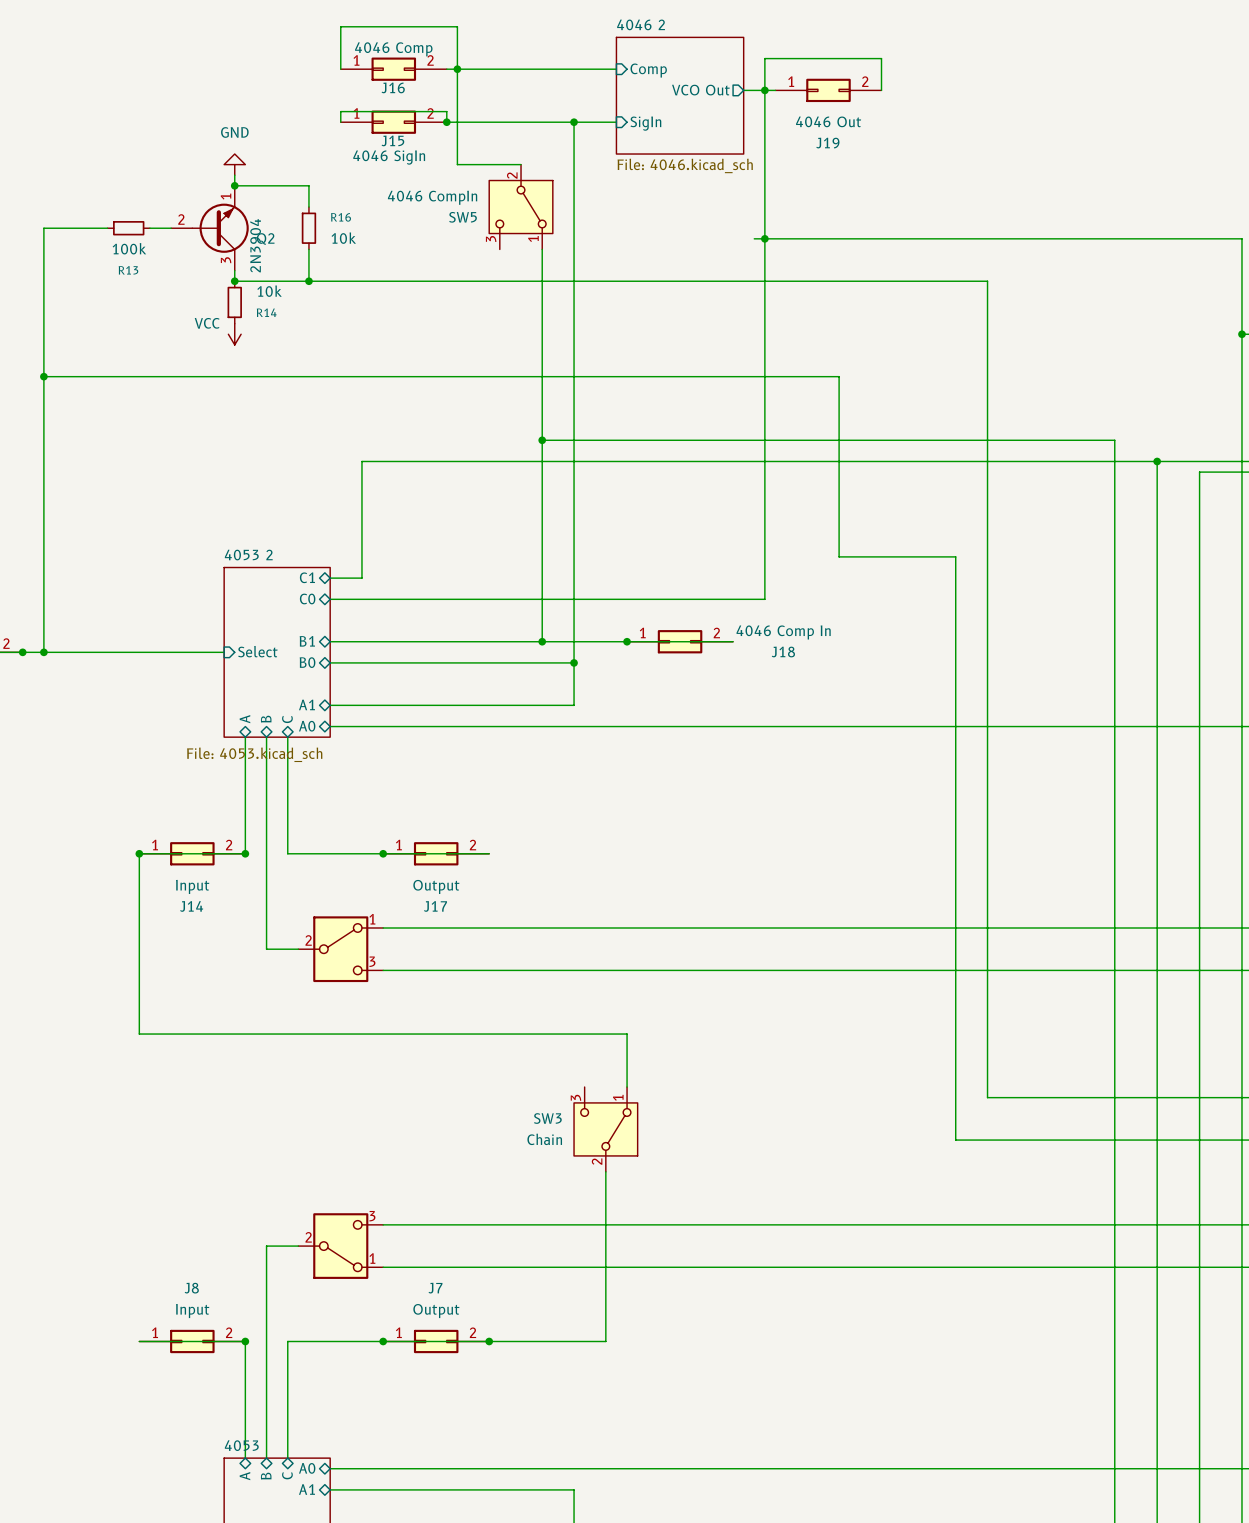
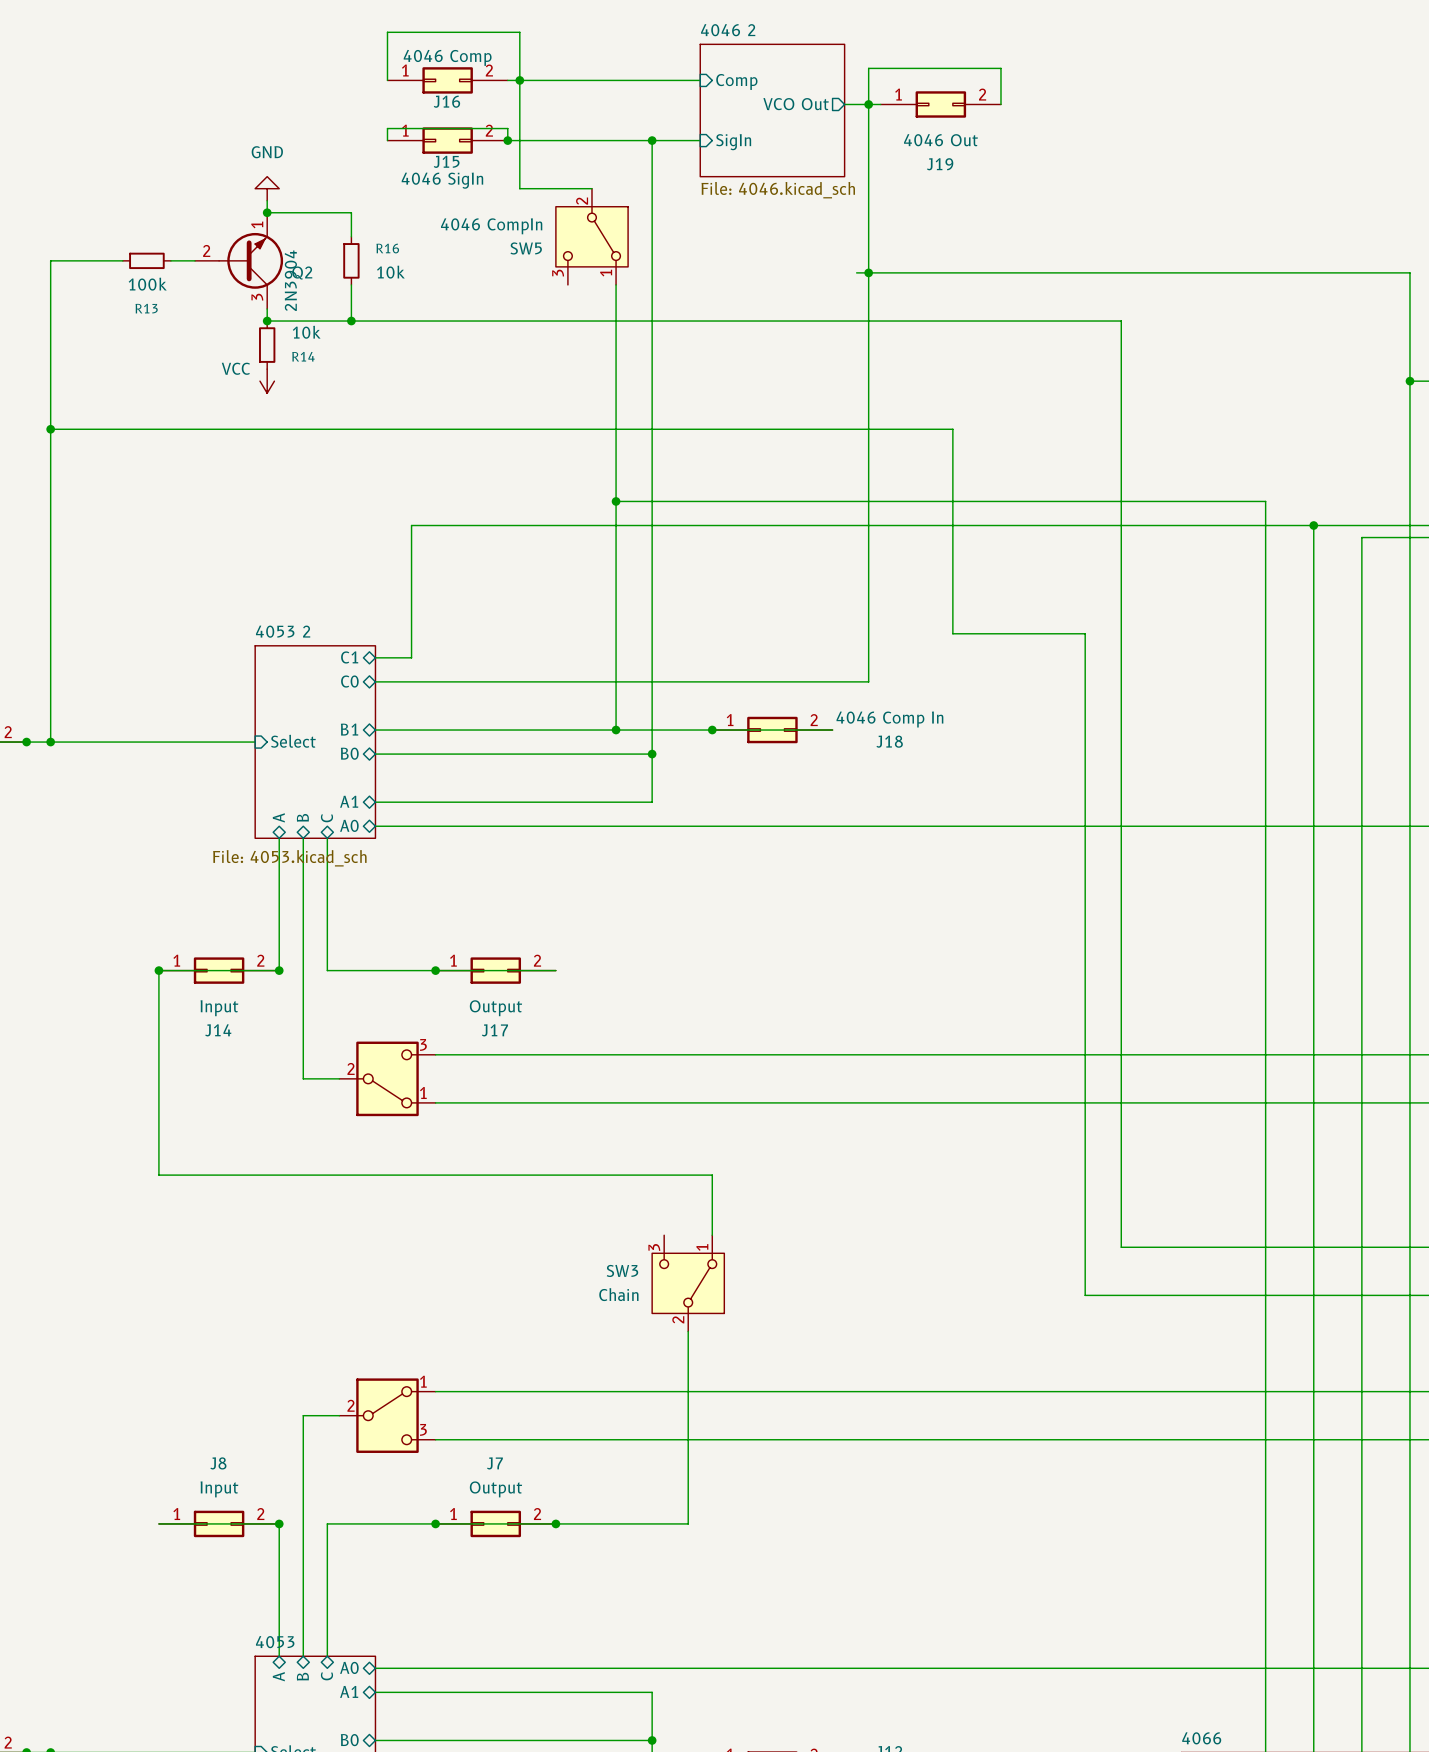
part flip: as is (340, 949) -> up-down (387, 1078)
part flip: as is (340, 1246) -> up-down (387, 1415)

